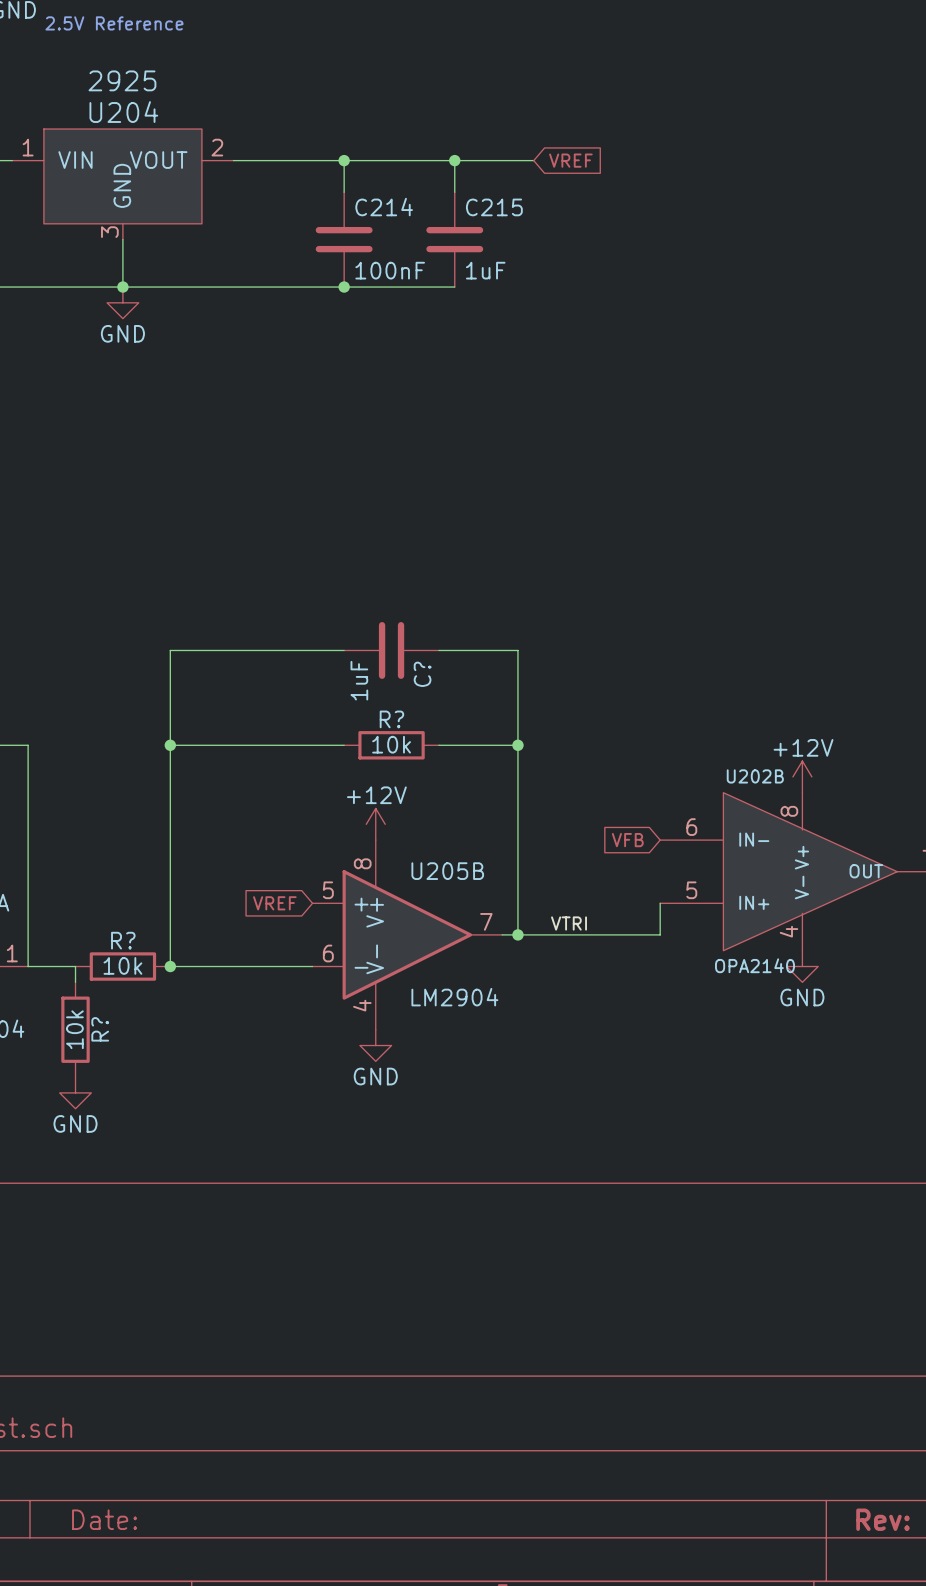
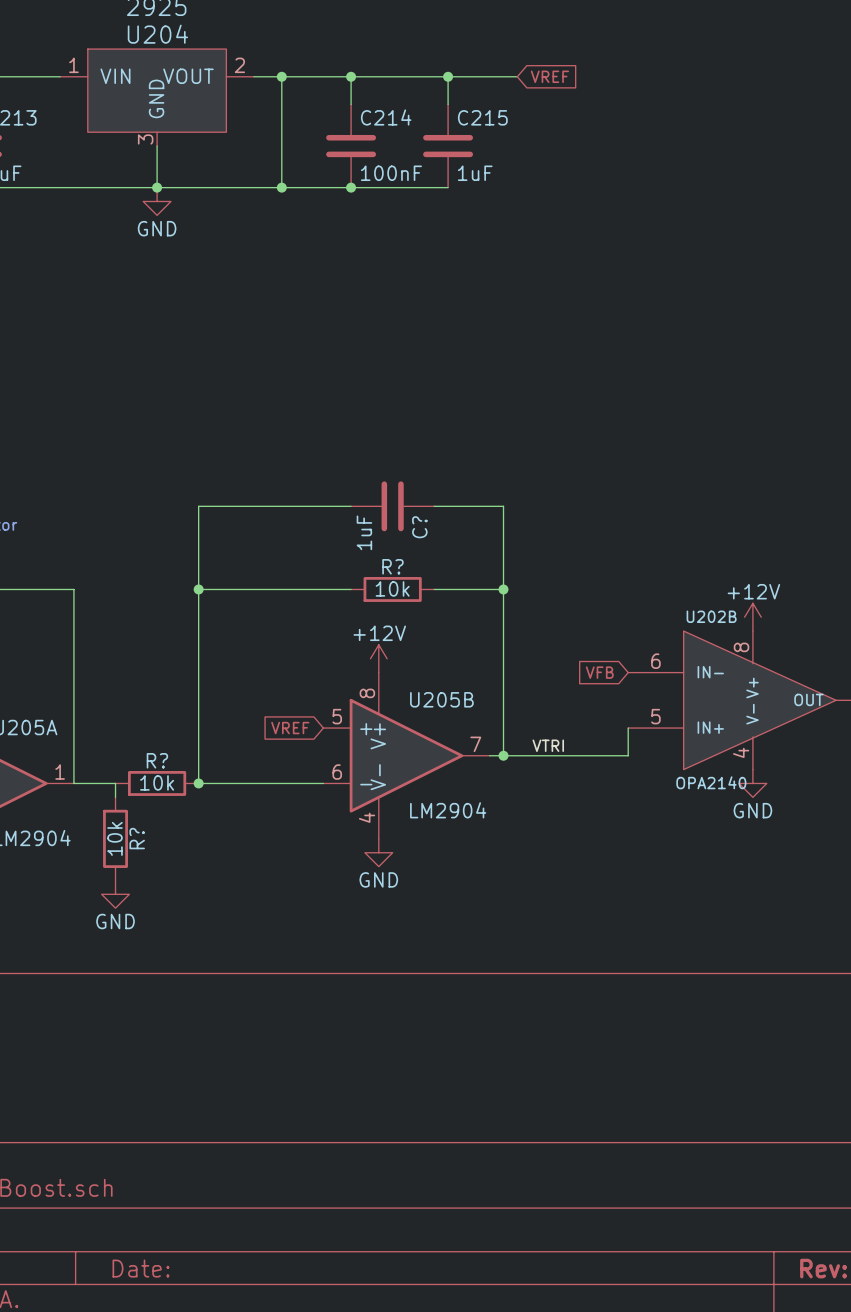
wire: none -> (281, 76) (281, 187)
junction: none -> (281, 76)
junction: none -> (281, 187)

